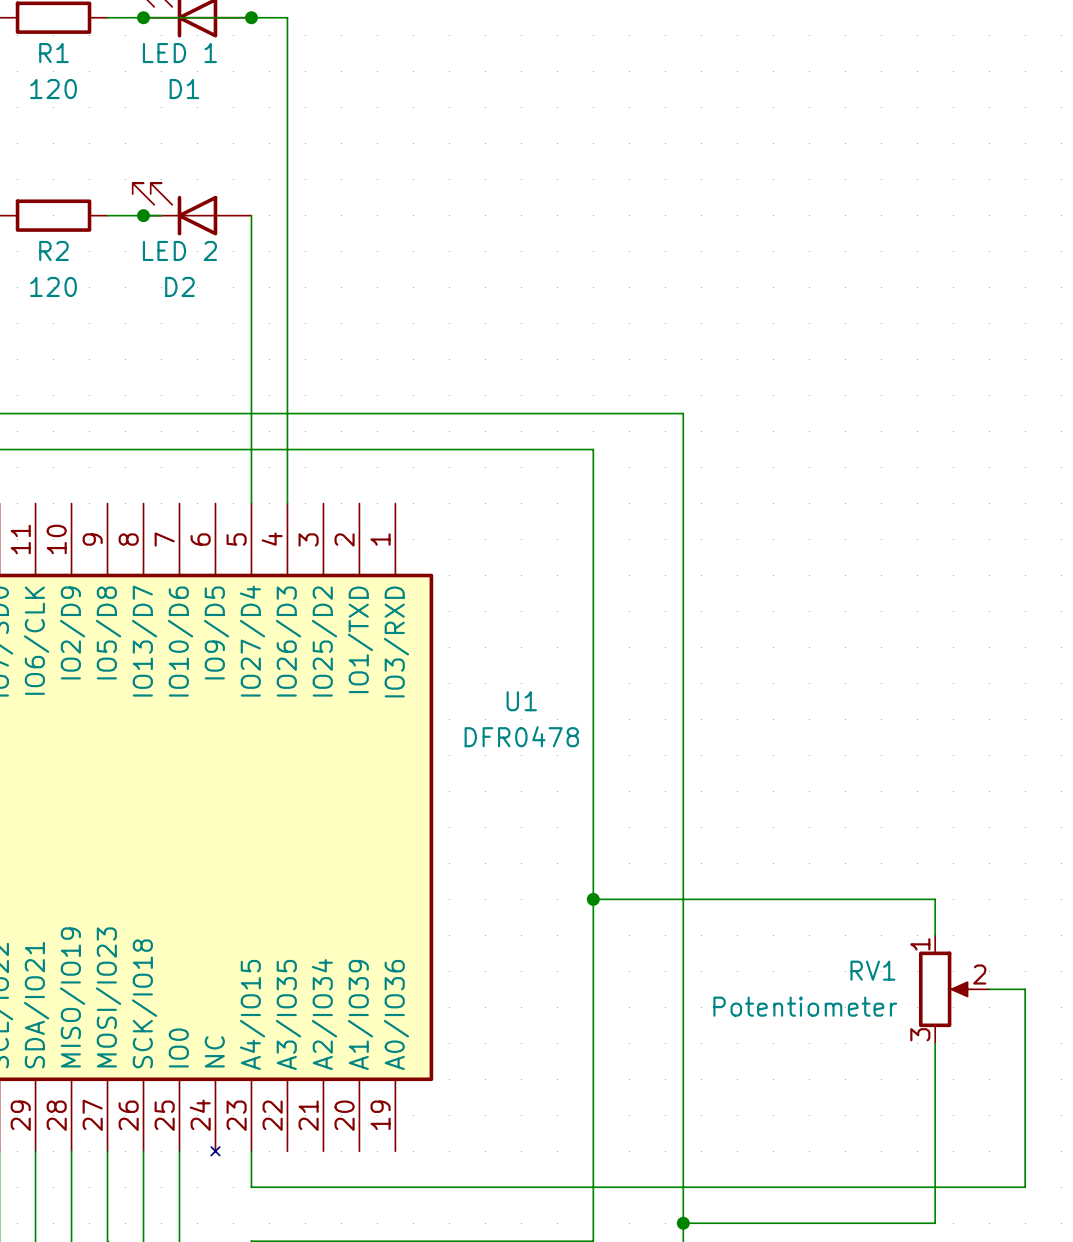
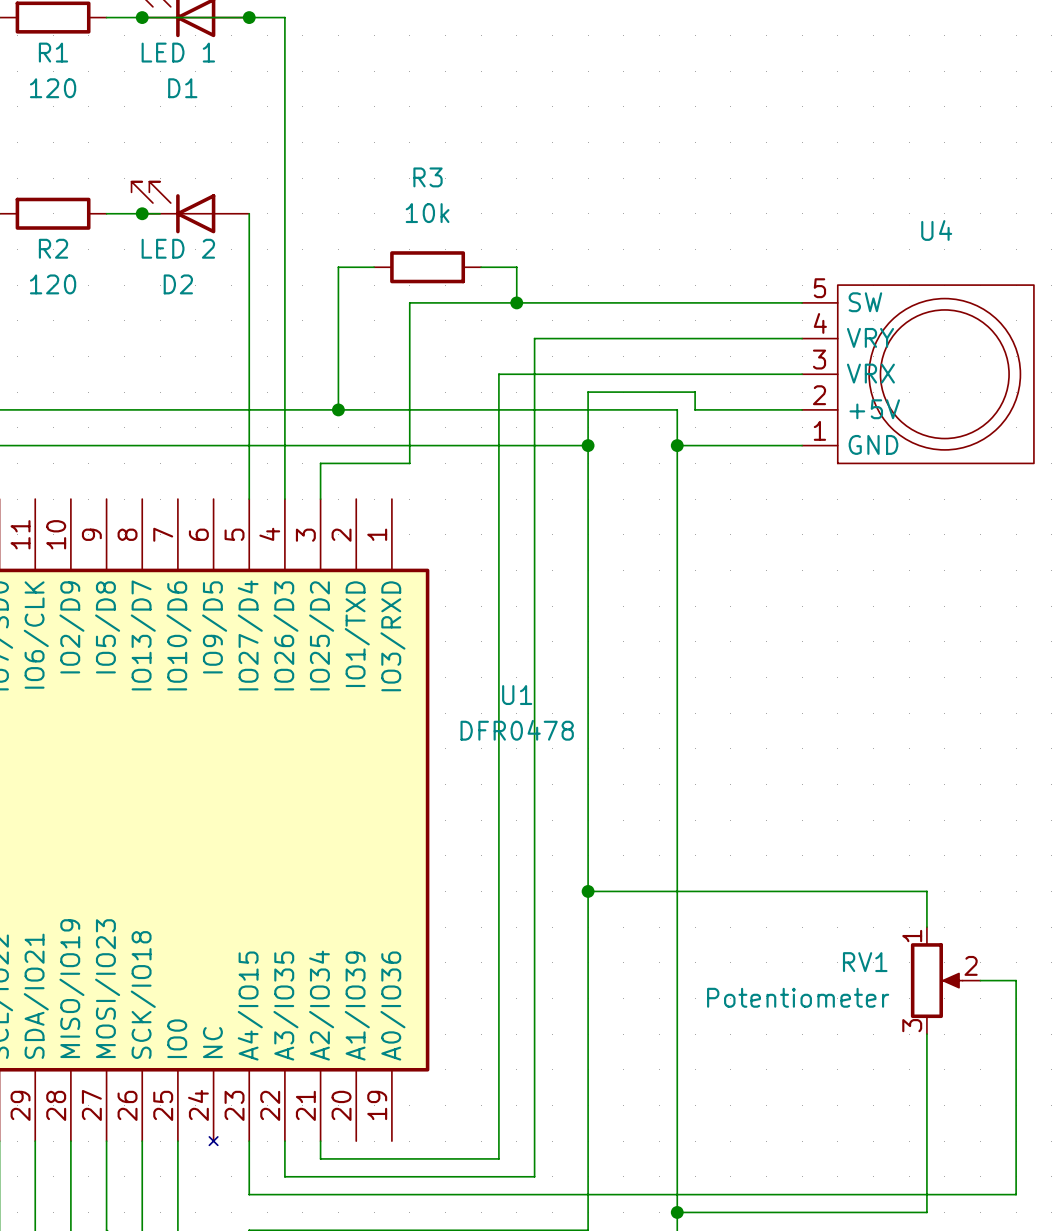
wire: none -> (374, 267) (338, 267) (338, 409)
R3: none -> 10k (427, 267)
wire: none -> (481, 267) (516, 267) (516, 302)
junction: none -> (516, 302)
wire: none -> (802, 302) (409, 302) (409, 463) (320, 463) (320, 499)
wire: none -> (802, 338) (534, 338) (534, 1176)
wire: none -> (802, 374) (498, 374) (498, 1158) (320, 1158) (320, 1141)
U4: none -> (918, 374)
junction: none -> (338, 409)
wire: none -> (802, 409) (695, 409) (695, 392) (588, 392) (588, 445)
junction: none -> (588, 445)
wire: none -> (677, 445) (802, 445)
junction: none -> (677, 445)
wire: (251, 1187) (287, 1187) -> (284, 1141) (284, 1176)
wire: (539, 1187) (1025, 1187) -> (249, 1176) (249, 1194) (1016, 1194) (1016, 1176)

